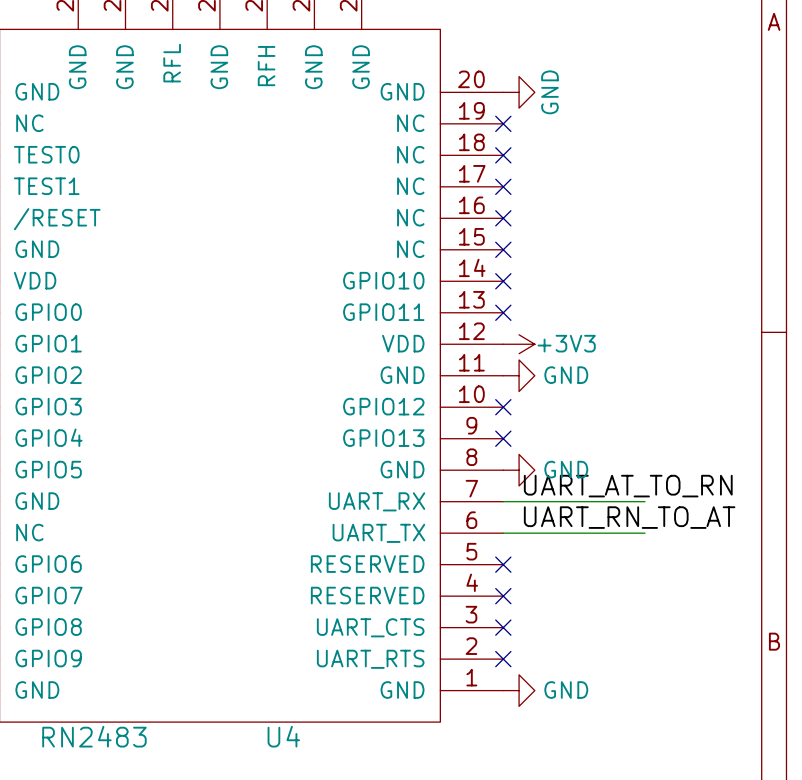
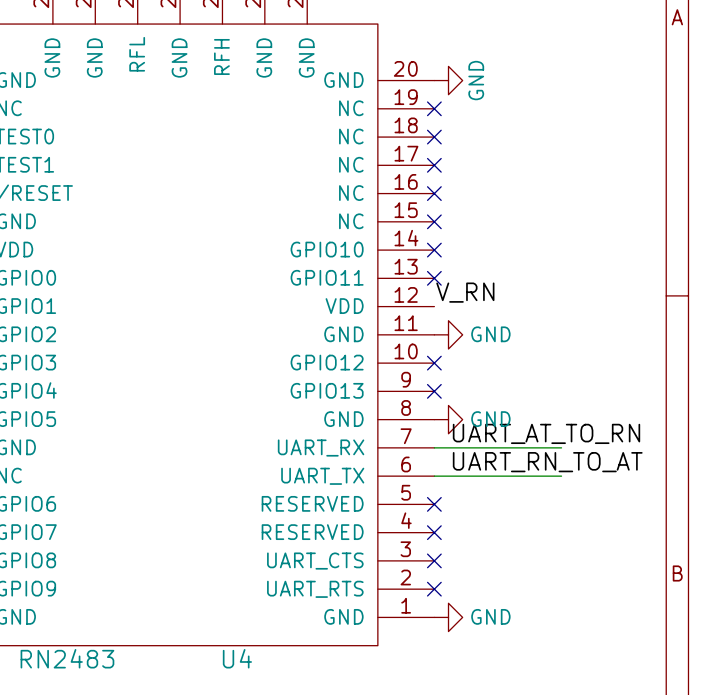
label: none -> V_RN (465, 292)
power symbol: +3V3 (519, 344) -> none

